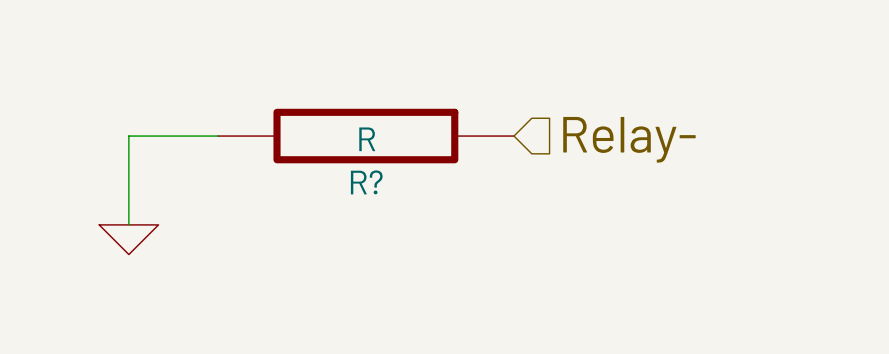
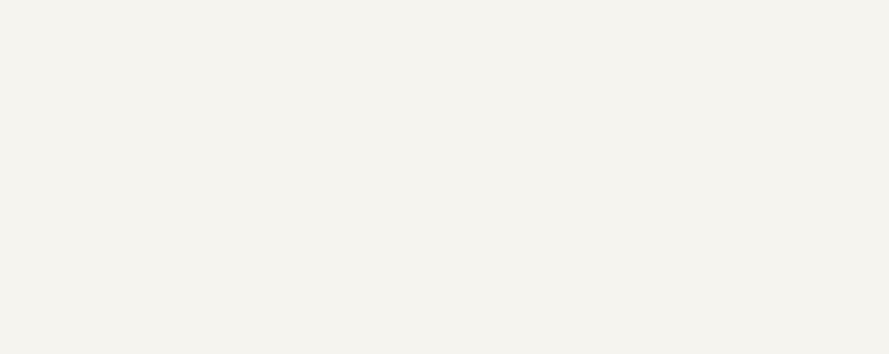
wire: (217, 136) (128, 136) (128, 224) -> none
R?: R (365, 136) -> none
hierarchical label: Relay- (629, 139) -> none
power symbol: (128, 239) -> none

